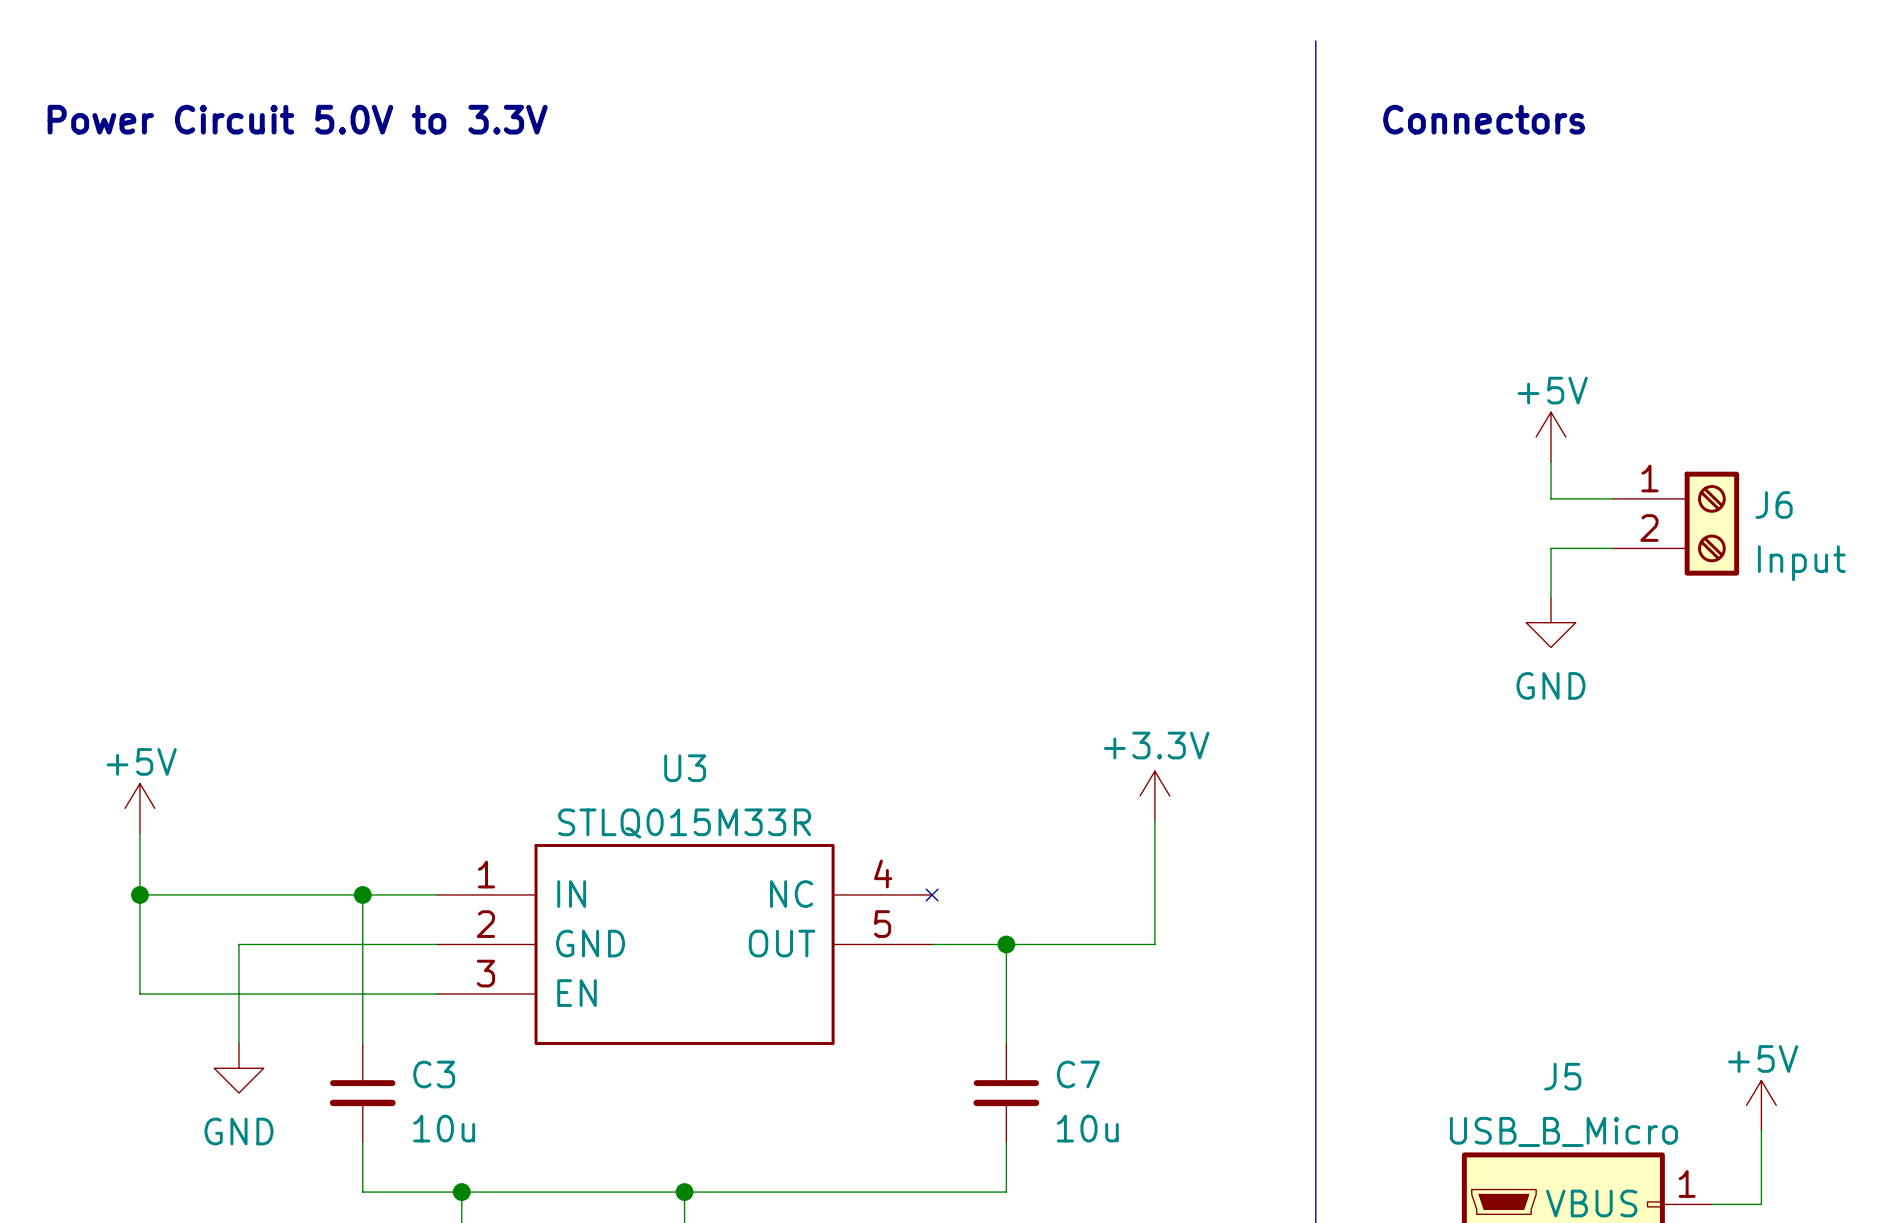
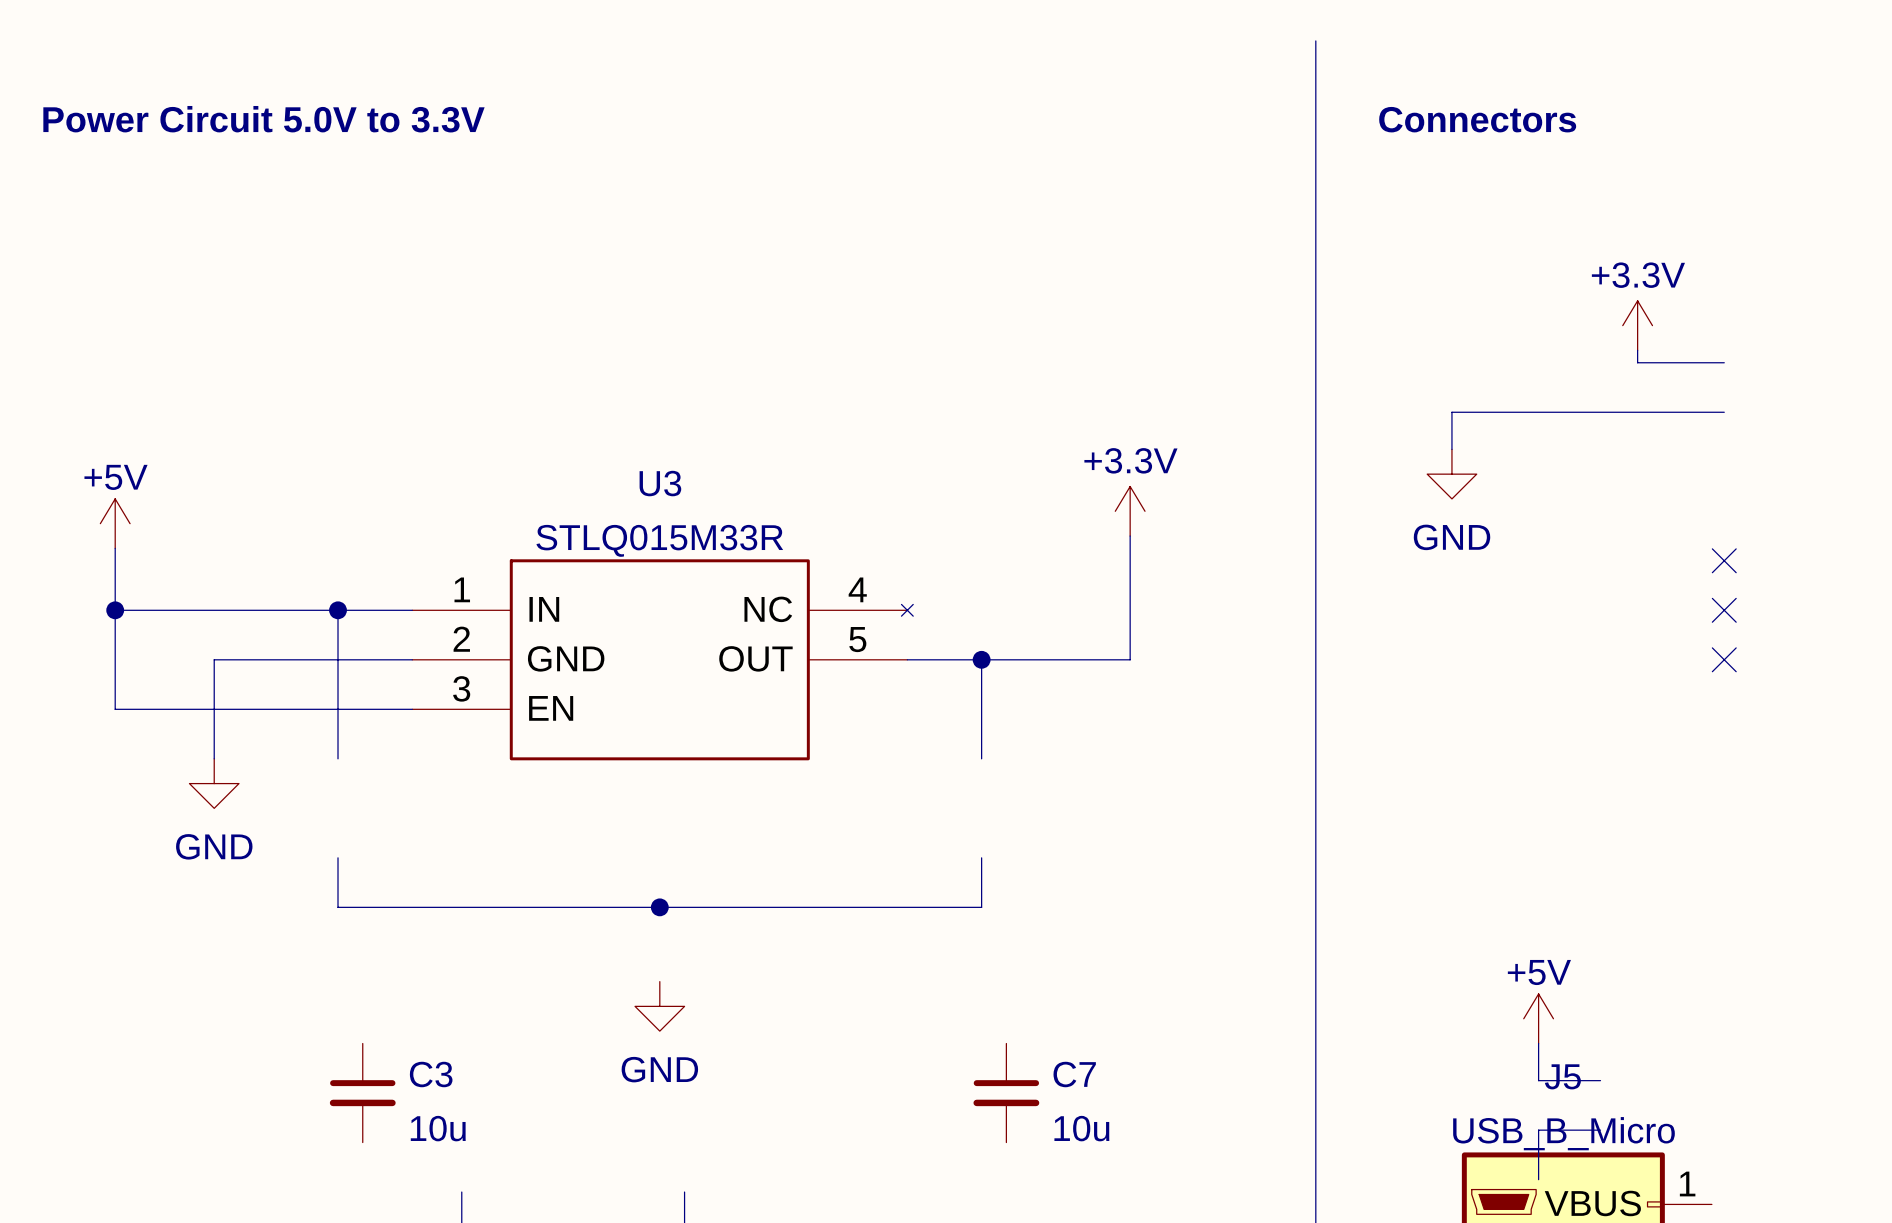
power symbol: none -> +3.3V (1637, 325)
wire: none -> (1637, 350) (1637, 362) (1724, 362)
wire: none -> (1724, 412) (1451, 412) (1451, 449)
power symbol: +5V (1550, 437) -> none
wire: (1550, 461) (1550, 498) (1612, 498) -> none
J6: Input (1675, 523) -> none
wire: (1612, 548) (1550, 548) (1550, 597) -> none
no-connect mark: none -> (1724, 560)
junction: none -> (115, 610)
junction: none -> (338, 610)
no-connect mark: none -> (1724, 610)
power symbol position: GND (1550, 622) -> GND (1451, 474)
junction: none -> (981, 659)
no-connect mark: none -> (1724, 659)
power symbol: none -> GND (214, 783)
power symbol position: +3.3V (1154, 795) -> +3.3V (1130, 511)
power symbol position: +5V (139, 808) -> +5V (115, 523)
wire: (1154, 820) (1154, 944) (932, 944) -> (1130, 536) (1130, 659) (907, 659)
wire: (139, 833) (139, 994) (437, 994) -> (115, 548) (115, 709) (412, 709)
wire: (139, 894) (437, 894) -> (115, 610) (412, 610)
junction: (139, 894) -> none
wire: (362, 894) (362, 1043) -> (338, 610) (338, 758)
junction: (362, 894) -> none
junction: none -> (659, 907)
wire: (437, 944) (238, 944) (238, 1043) -> (412, 659) (214, 659) (214, 758)
U3 position: (687, 944) -> (662, 659)
wire: (1006, 944) (1006, 1043) -> (981, 659) (981, 758)
junction: (1006, 944) -> none
power symbol: none -> GND (659, 1006)
wire: none -> (1538, 1043) (1538, 1080) (1600, 1080)
power symbol: GND (238, 1068) -> none
power symbol position: +5V (1761, 1105) -> +5V (1538, 1018)
wire: none -> (1600, 1130) (1538, 1130) (1538, 1179)
wire: (1761, 1130) (1761, 1204) (1711, 1204) -> none
wire: (362, 1142) (362, 1192) (1006, 1192) (1006, 1142) -> (338, 857) (338, 907) (981, 907) (981, 857)
junction: (461, 1192) -> none
junction: (684, 1192) -> none

